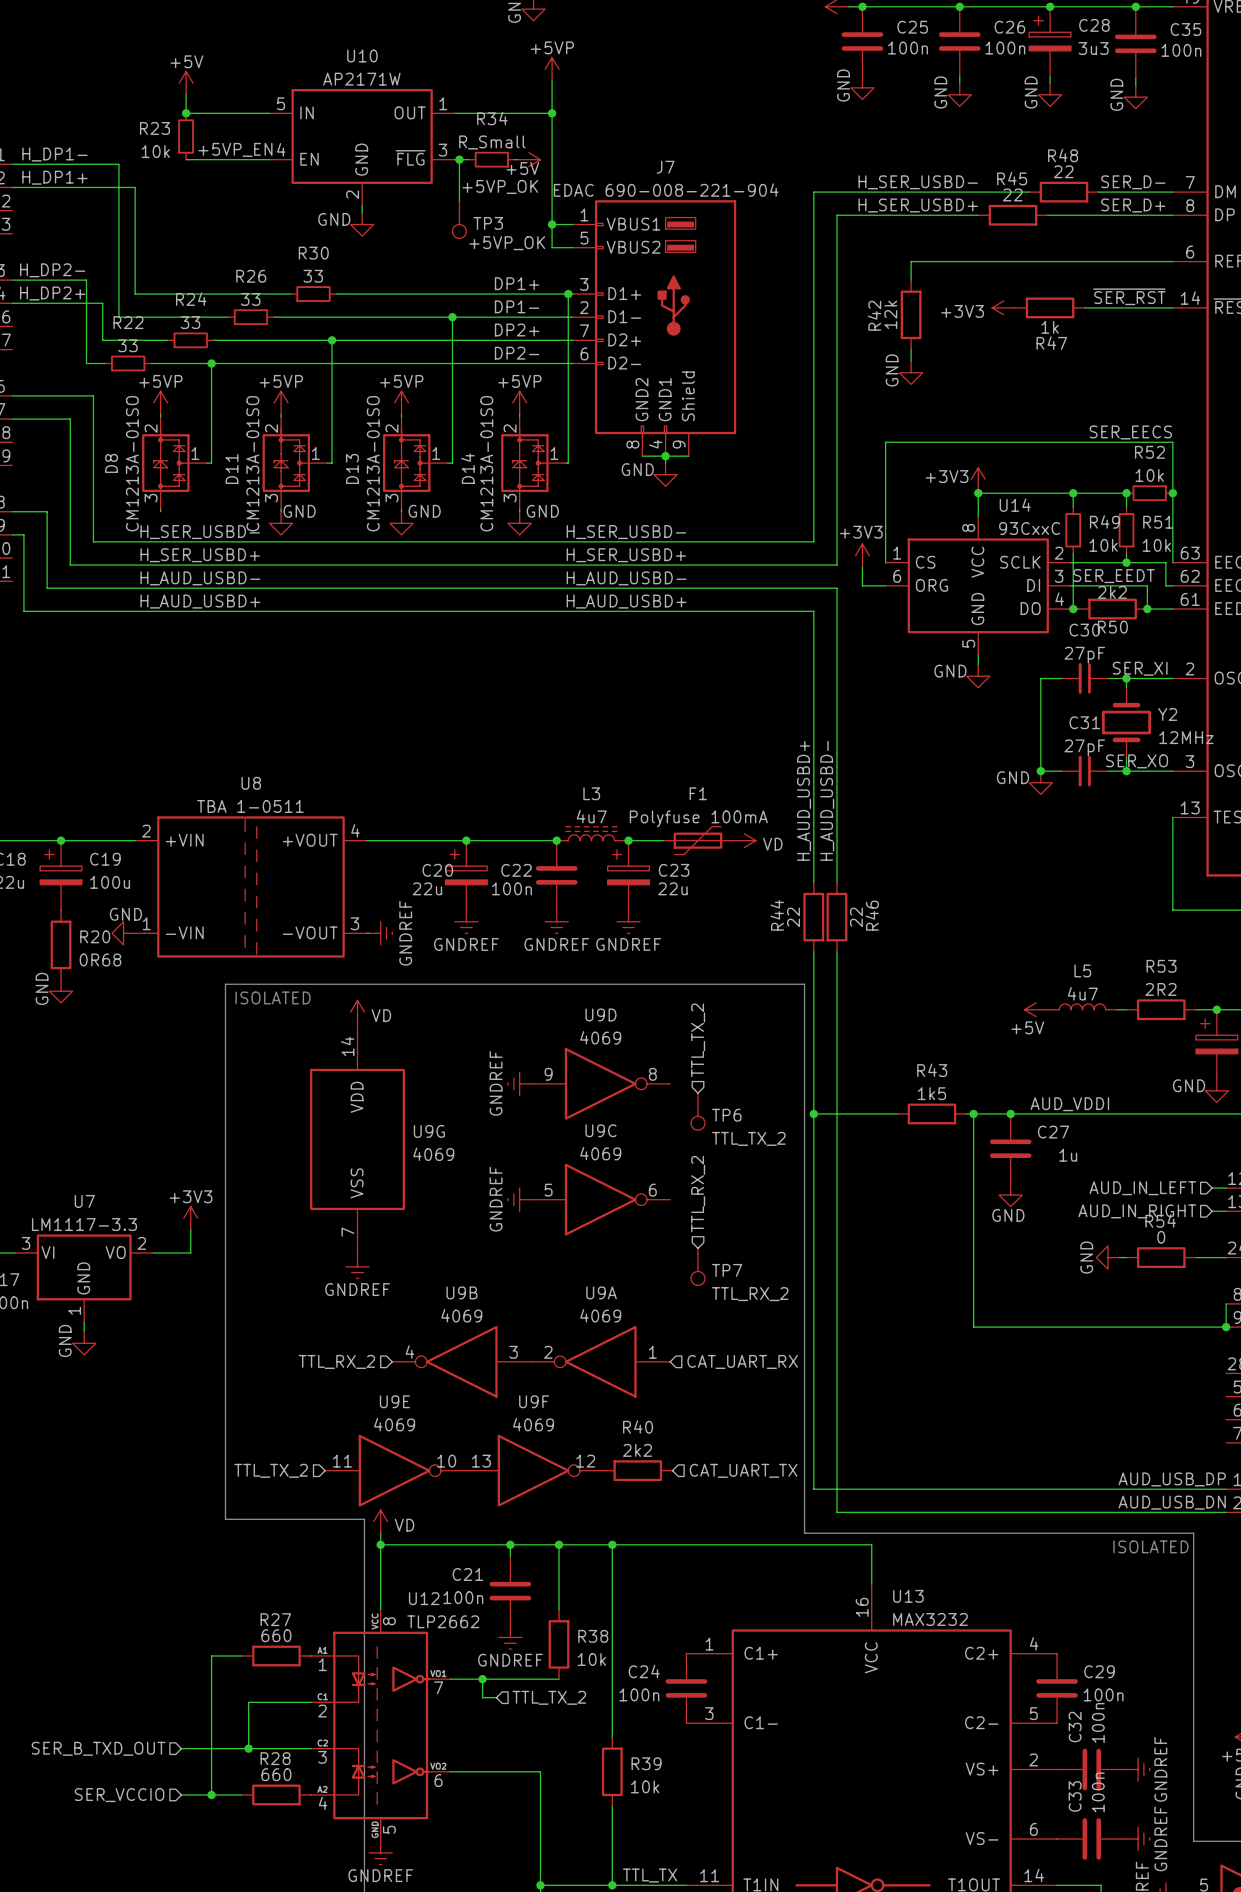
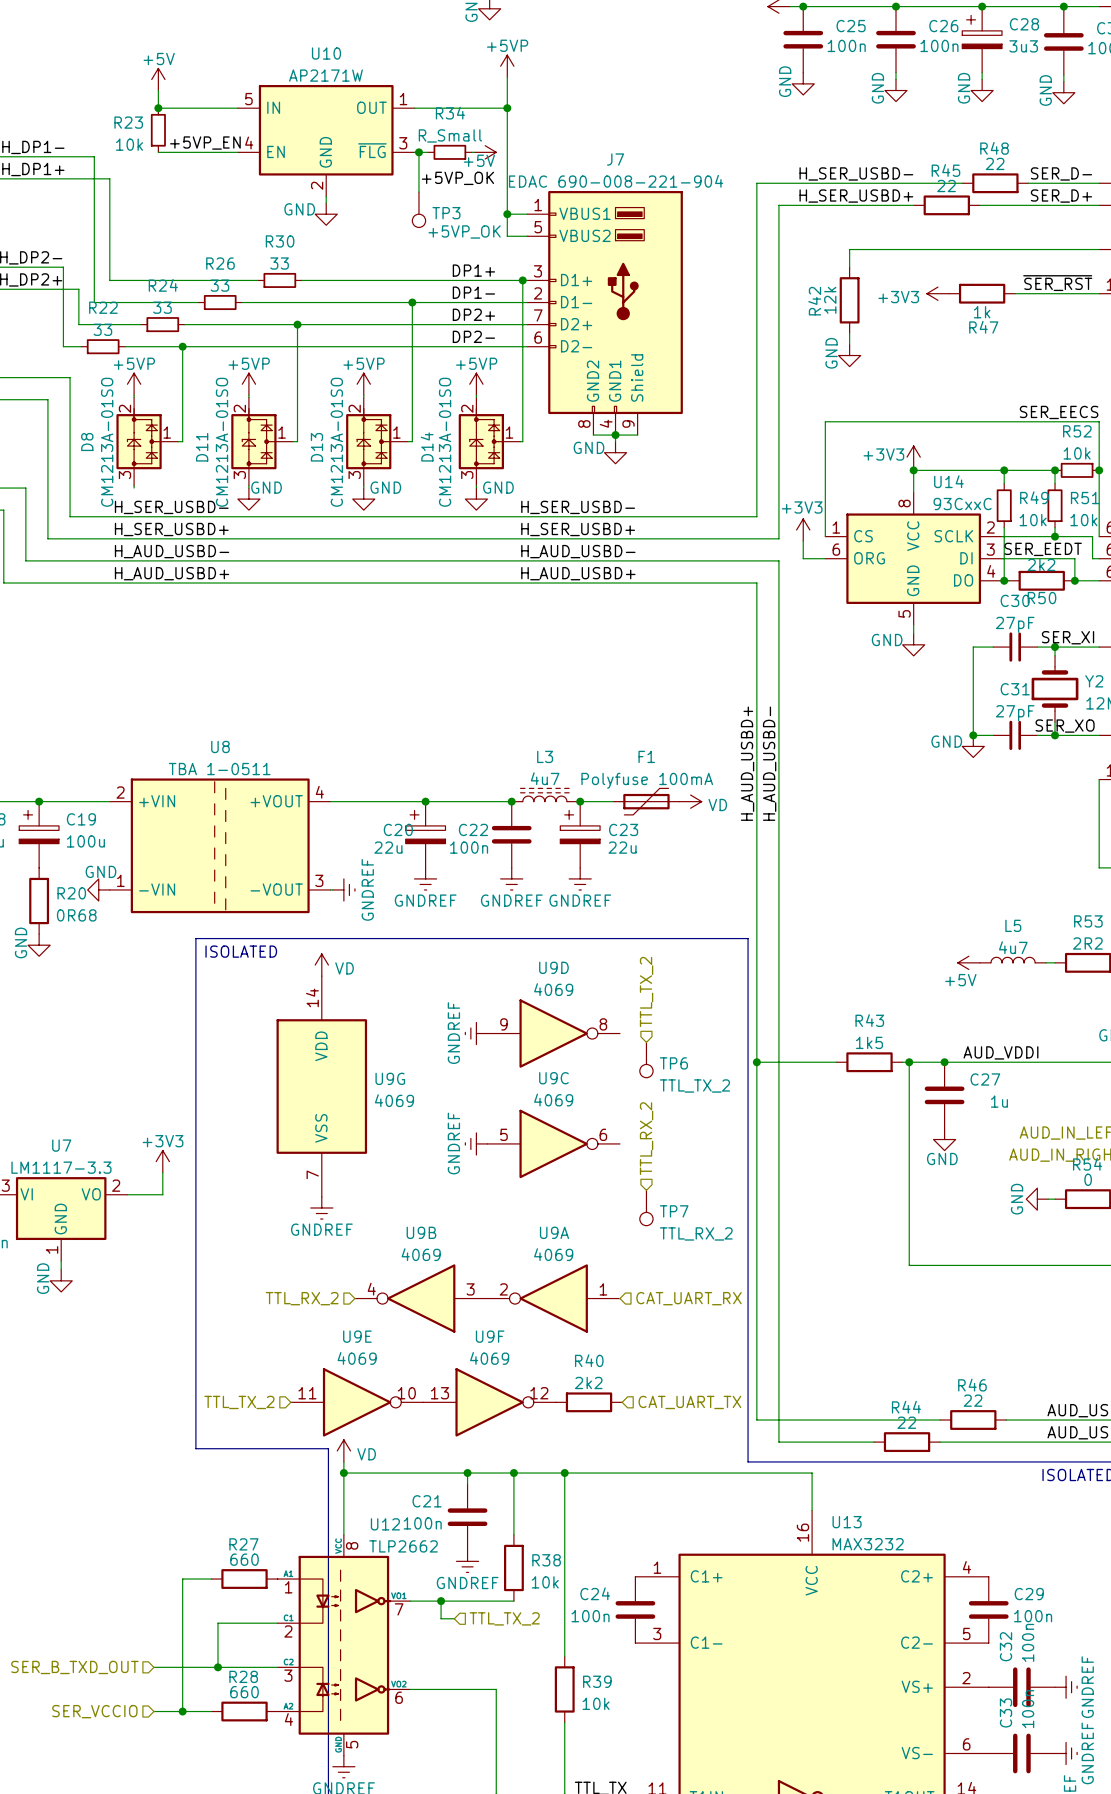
wire: none -> (756, 841) (756, 907)
wire: none -> (778, 841) (778, 907)
R46 name position: R46 (872, 915) -> R46 (972, 1385)
R44 rotation: 0° (813, 917) -> 90° clockwise (907, 1442)
R44 position: (813, 917) -> (907, 1442)
R46 rotation: 0° (836, 917) -> 90° clockwise (973, 1420)
R46 position: (836, 917) -> (973, 1420)
R46 value position: 22 (856, 917) -> 22 (973, 1400)
wire: (1006, 1489) (1075, 1489) -> none
wire: (936, 1512) (1006, 1512) -> none

